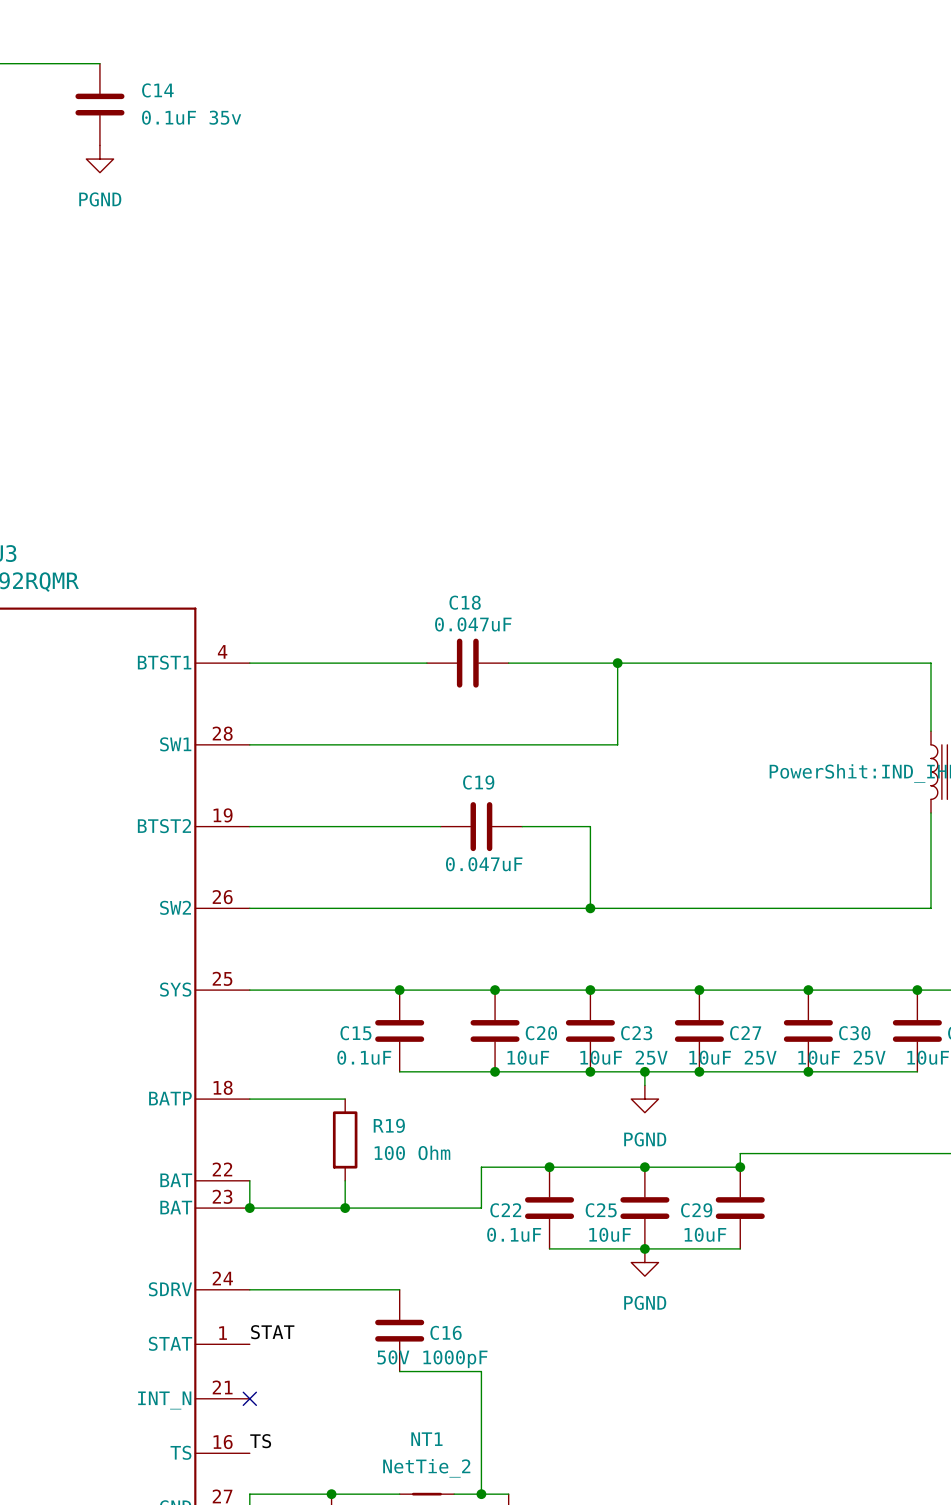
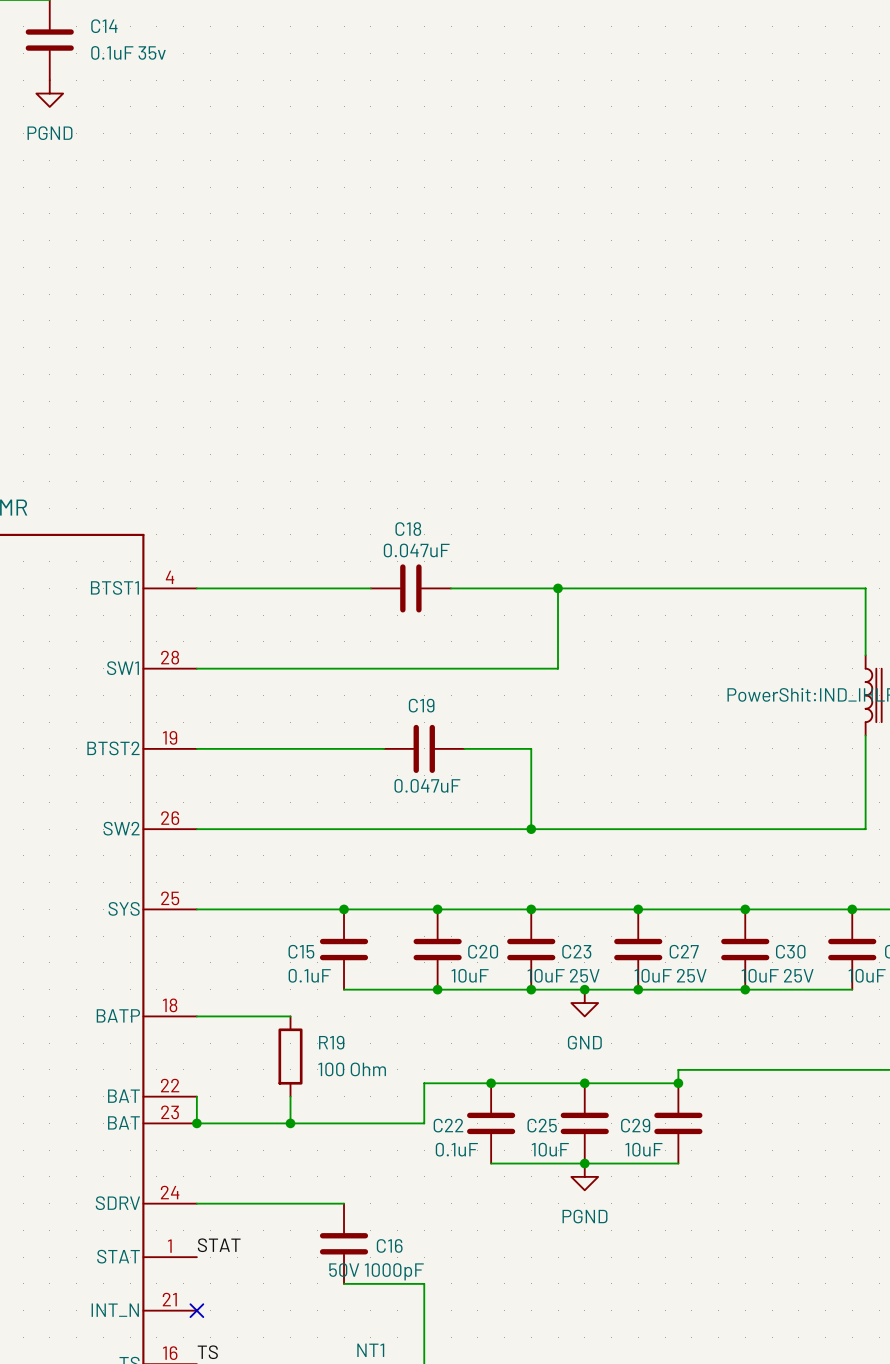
power symbol: none -> GND (584, 1003)
power symbol: PGND (644, 1099) -> none

